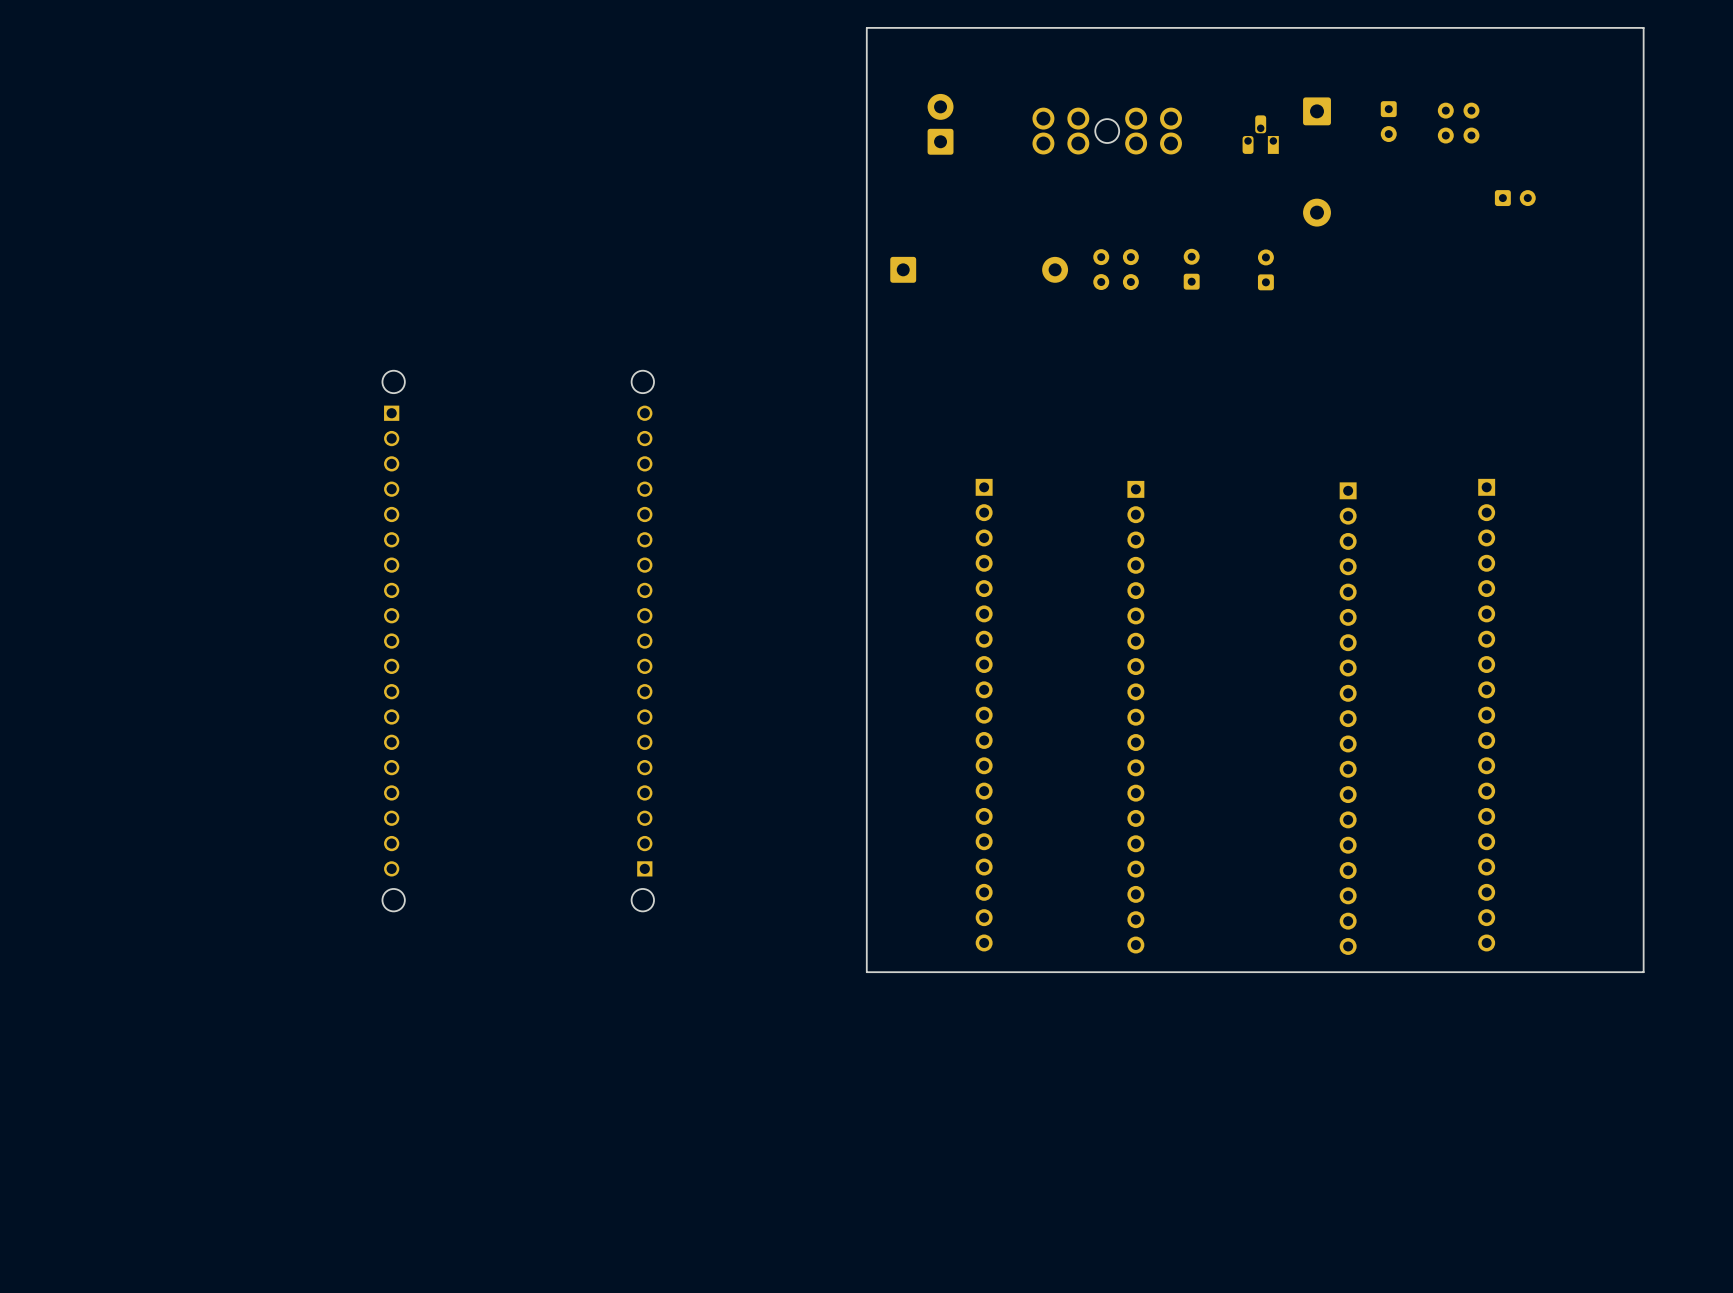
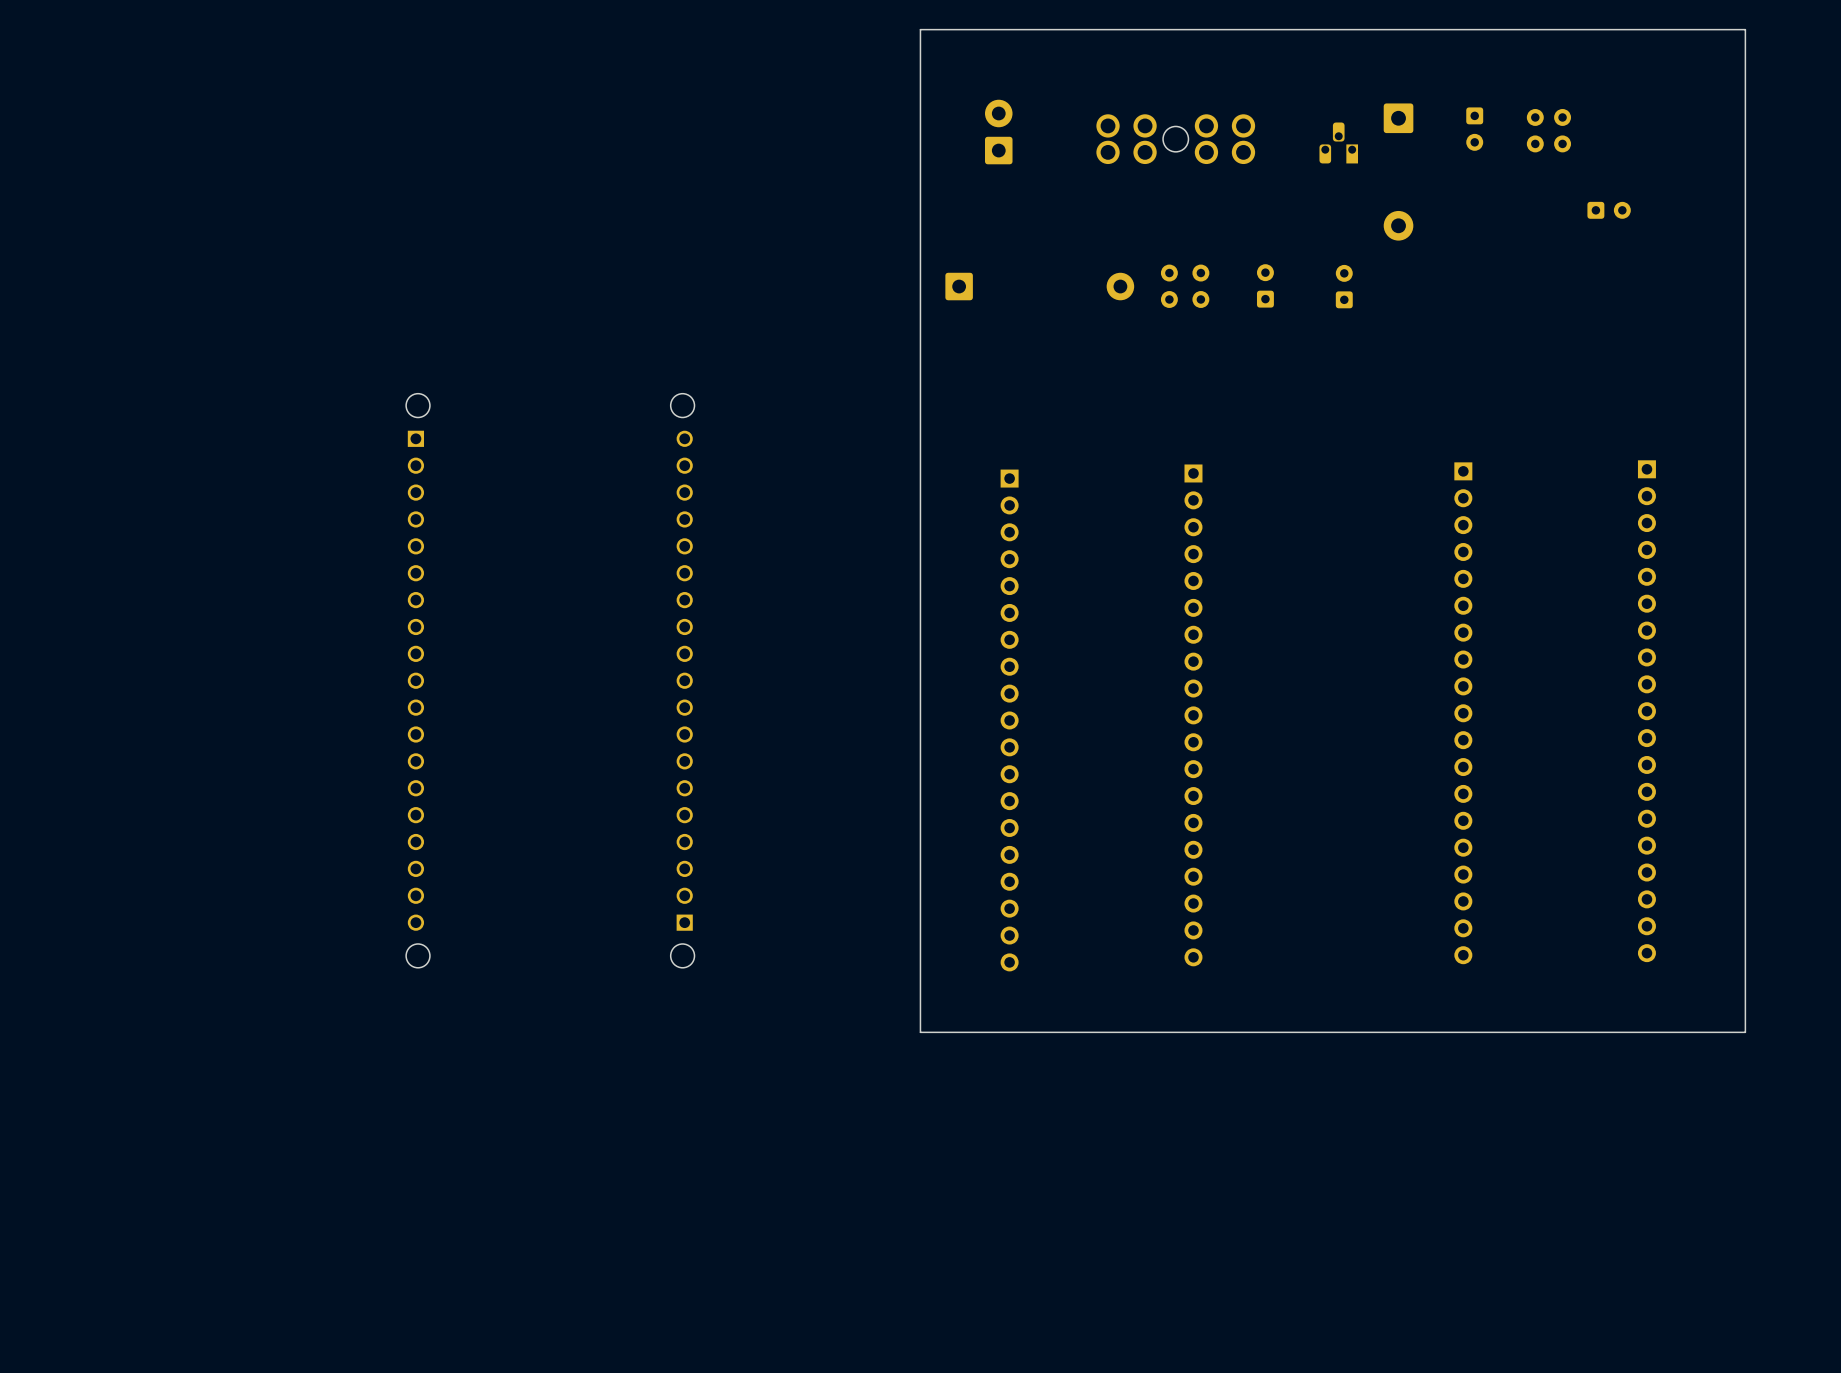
part: none -> (1646, 711)
part position: (984, 715) -> (1009, 720)
part: (1486, 715) -> none
part position: (1135, 717) -> (1193, 715)
part position: (1348, 718) -> (1463, 713)

